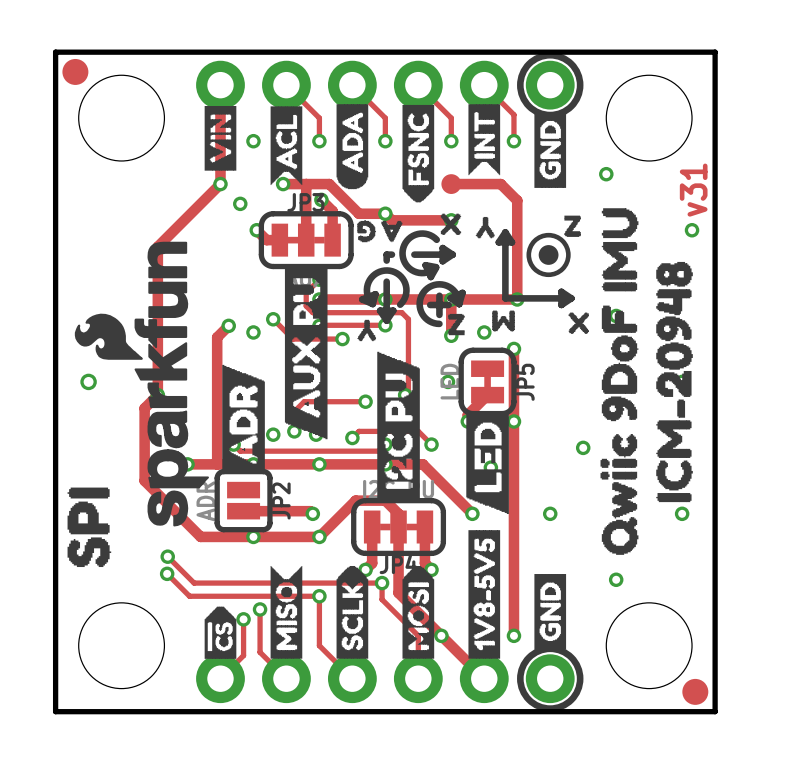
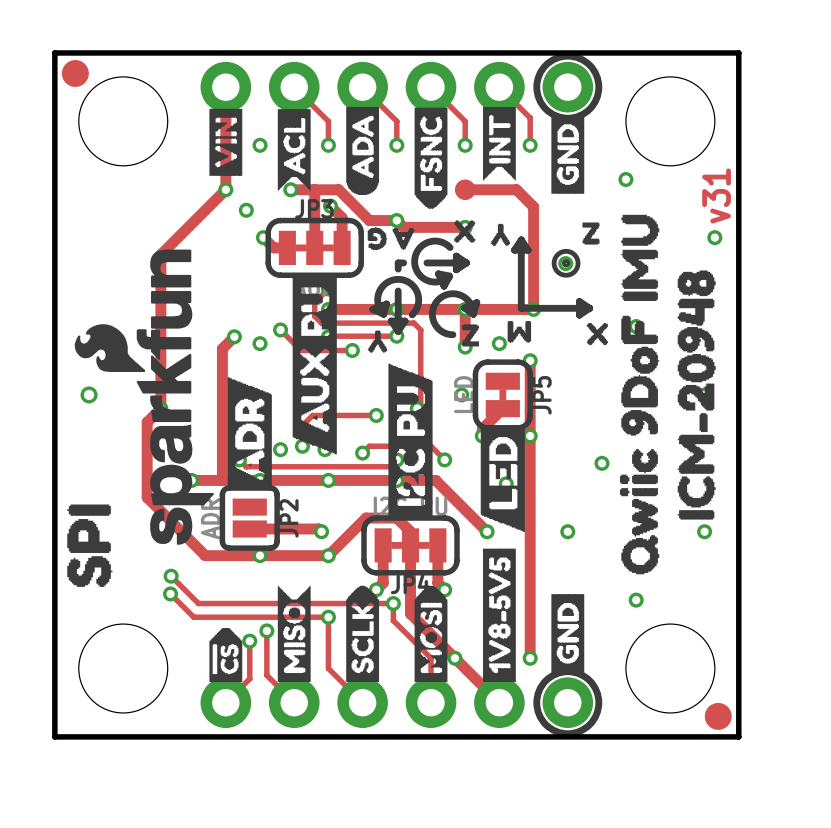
drawing: [526, 232, 571, 278] -> none
drawing: none -> [551, 248, 581, 278]
line: (439, 295) (439, 314) -> none
line: (430, 304) (448, 304) -> none

